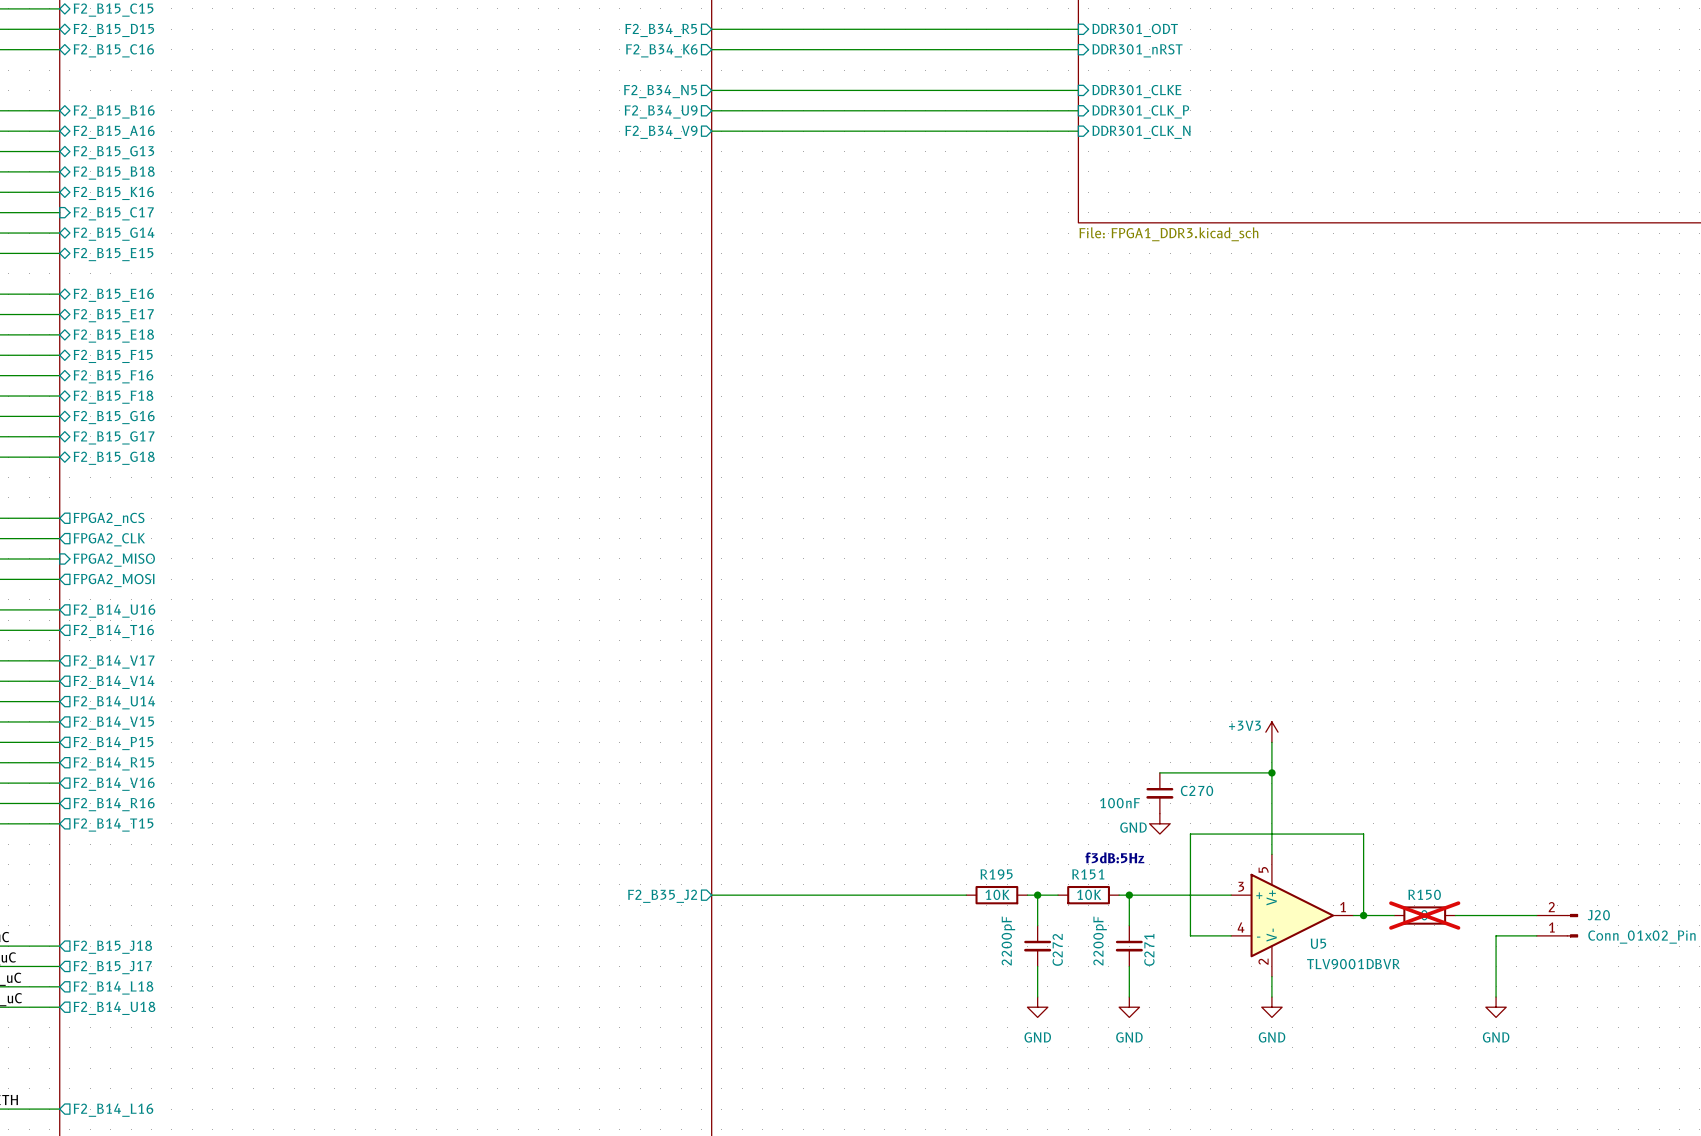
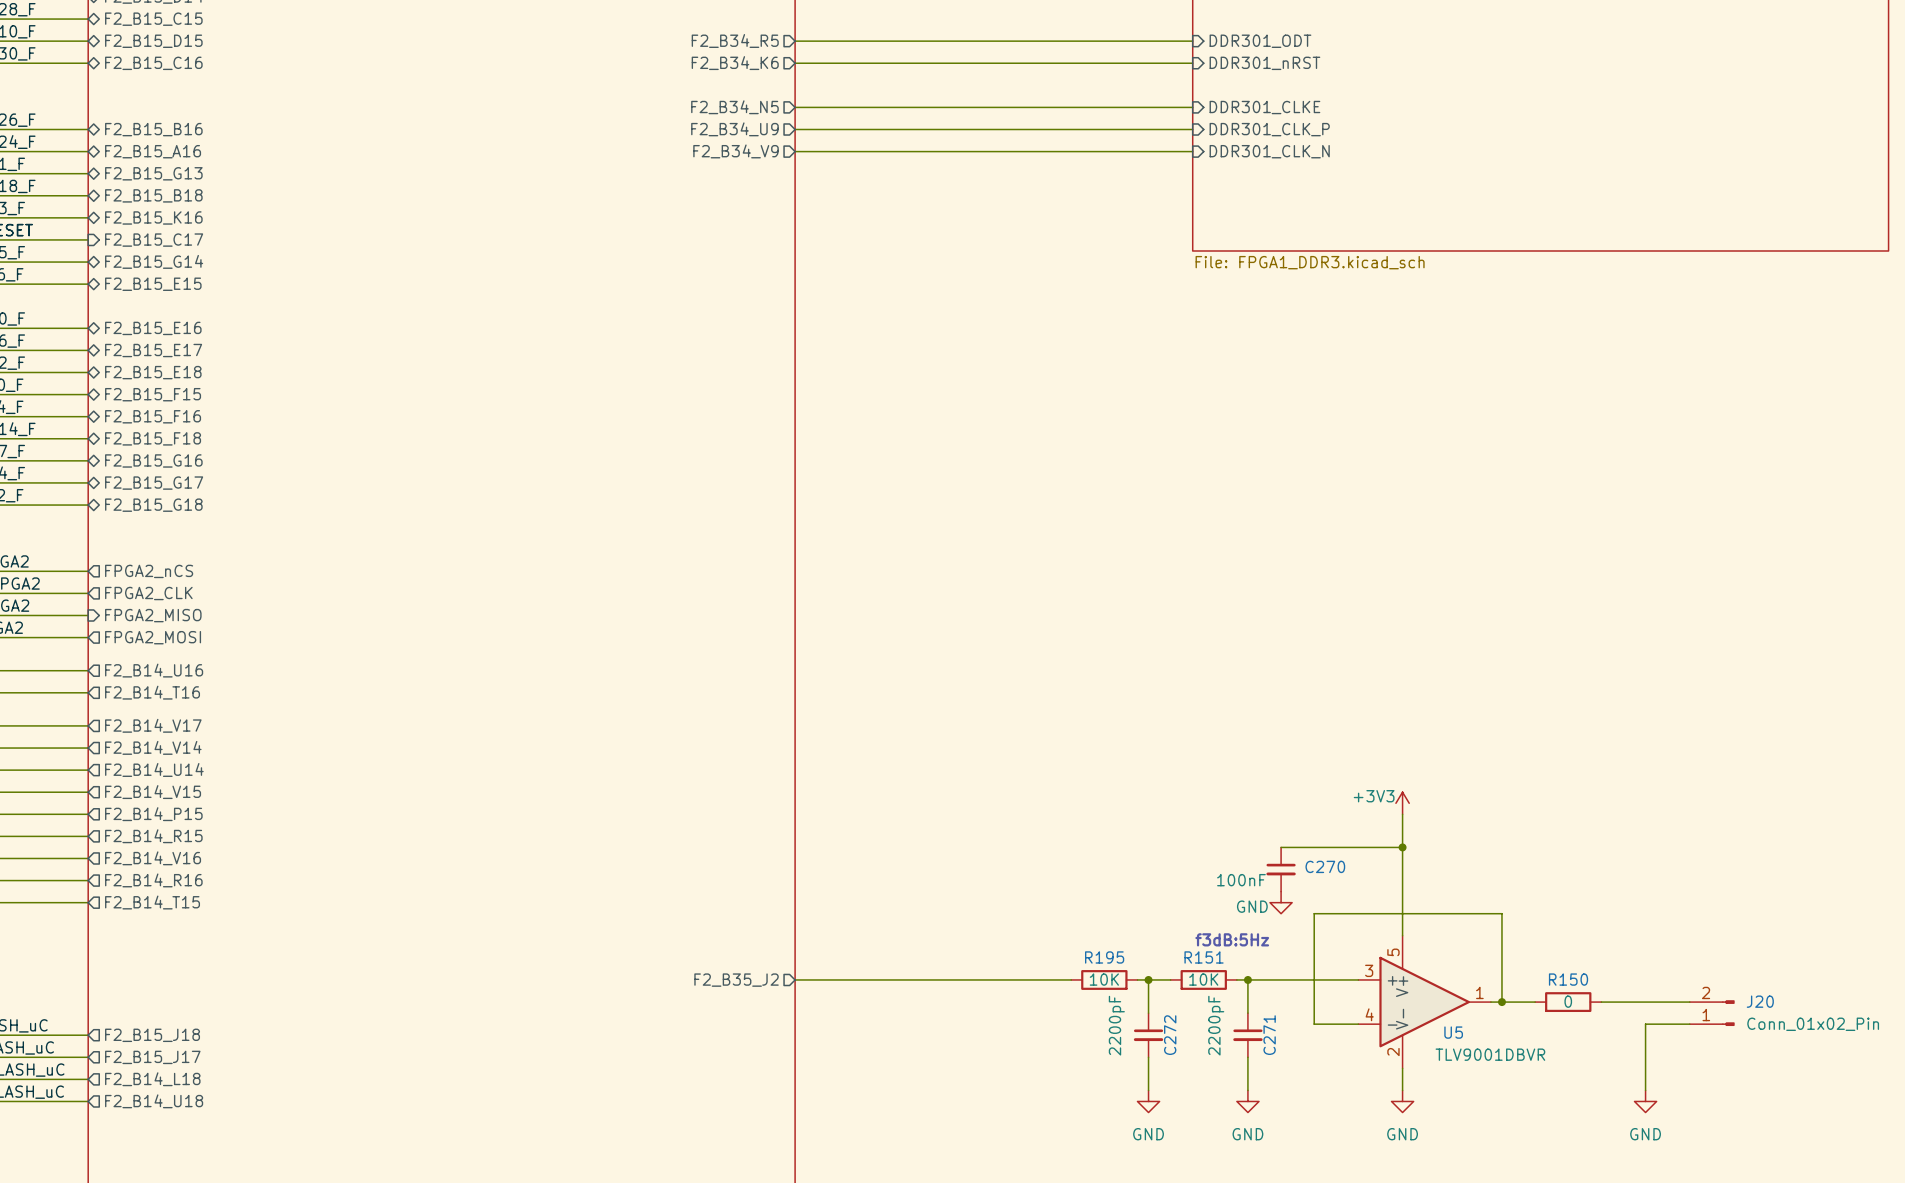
R150 do-not-place cross: (1424, 915) -> none

